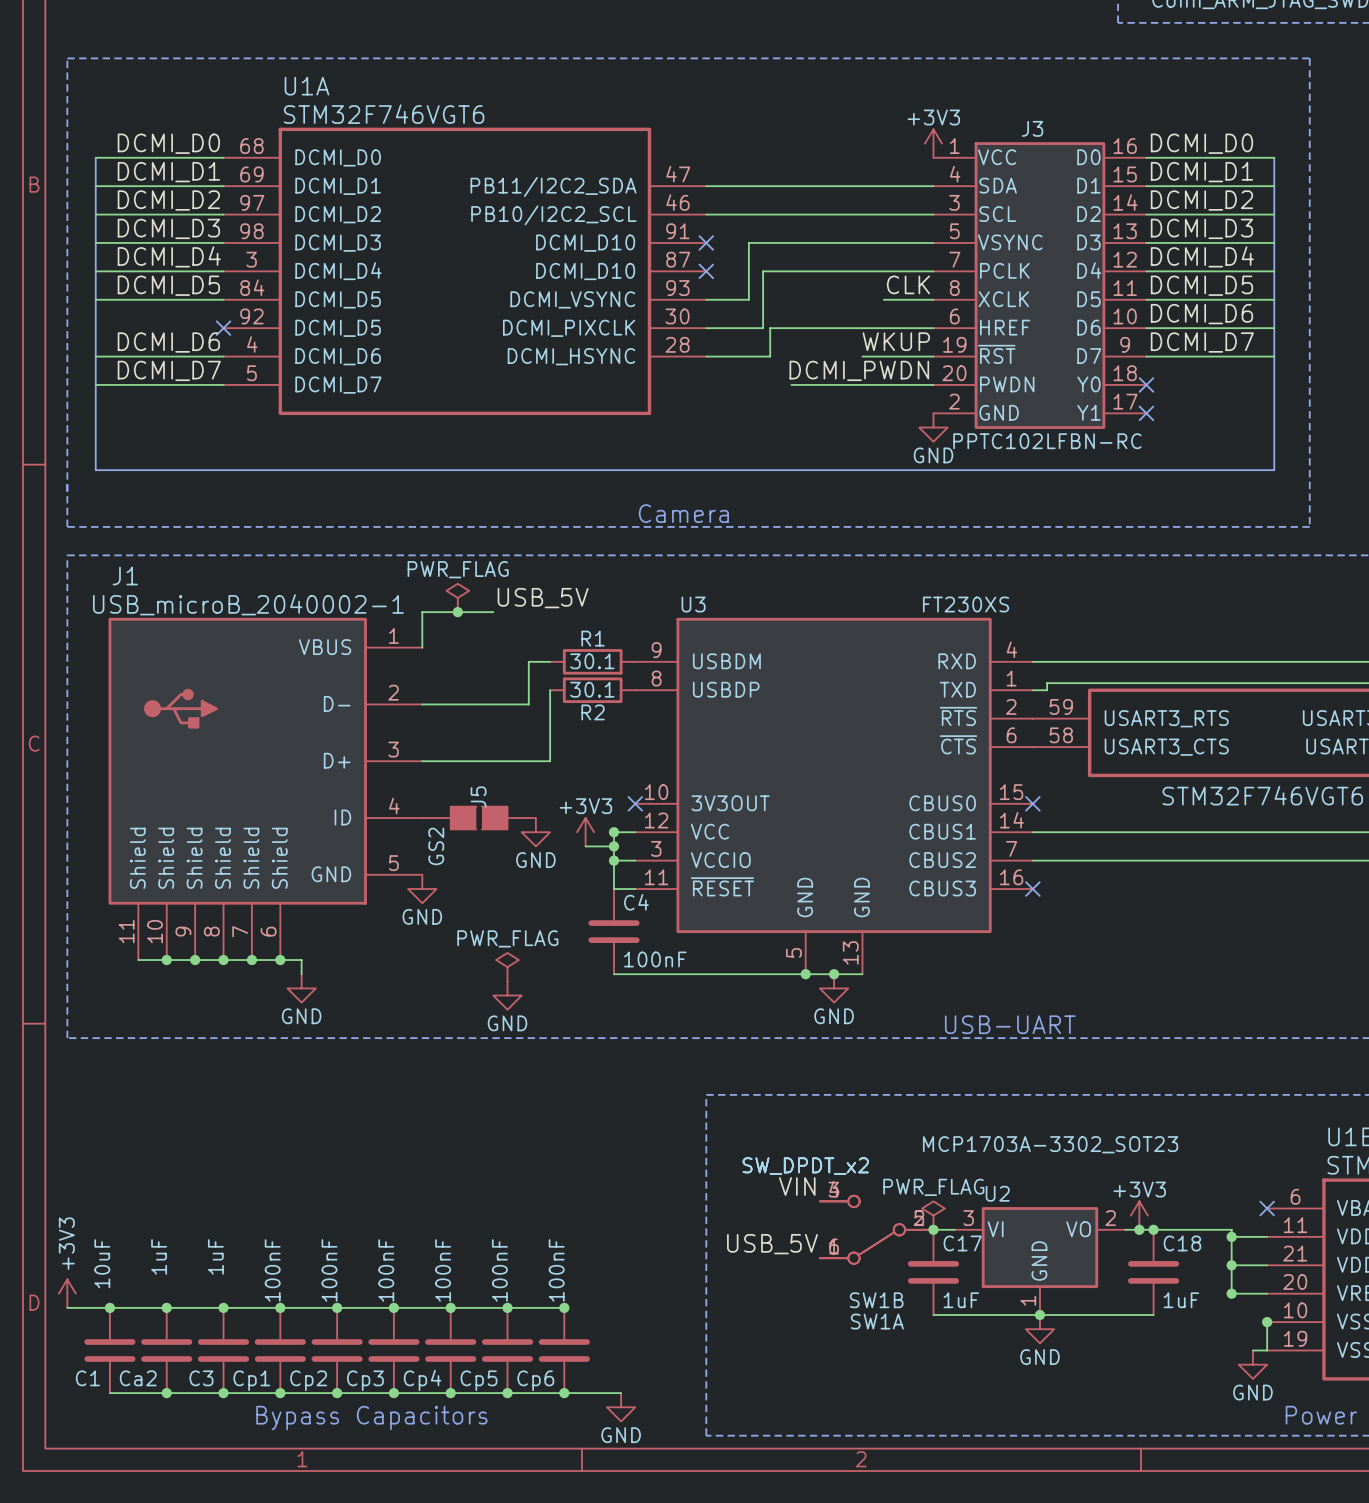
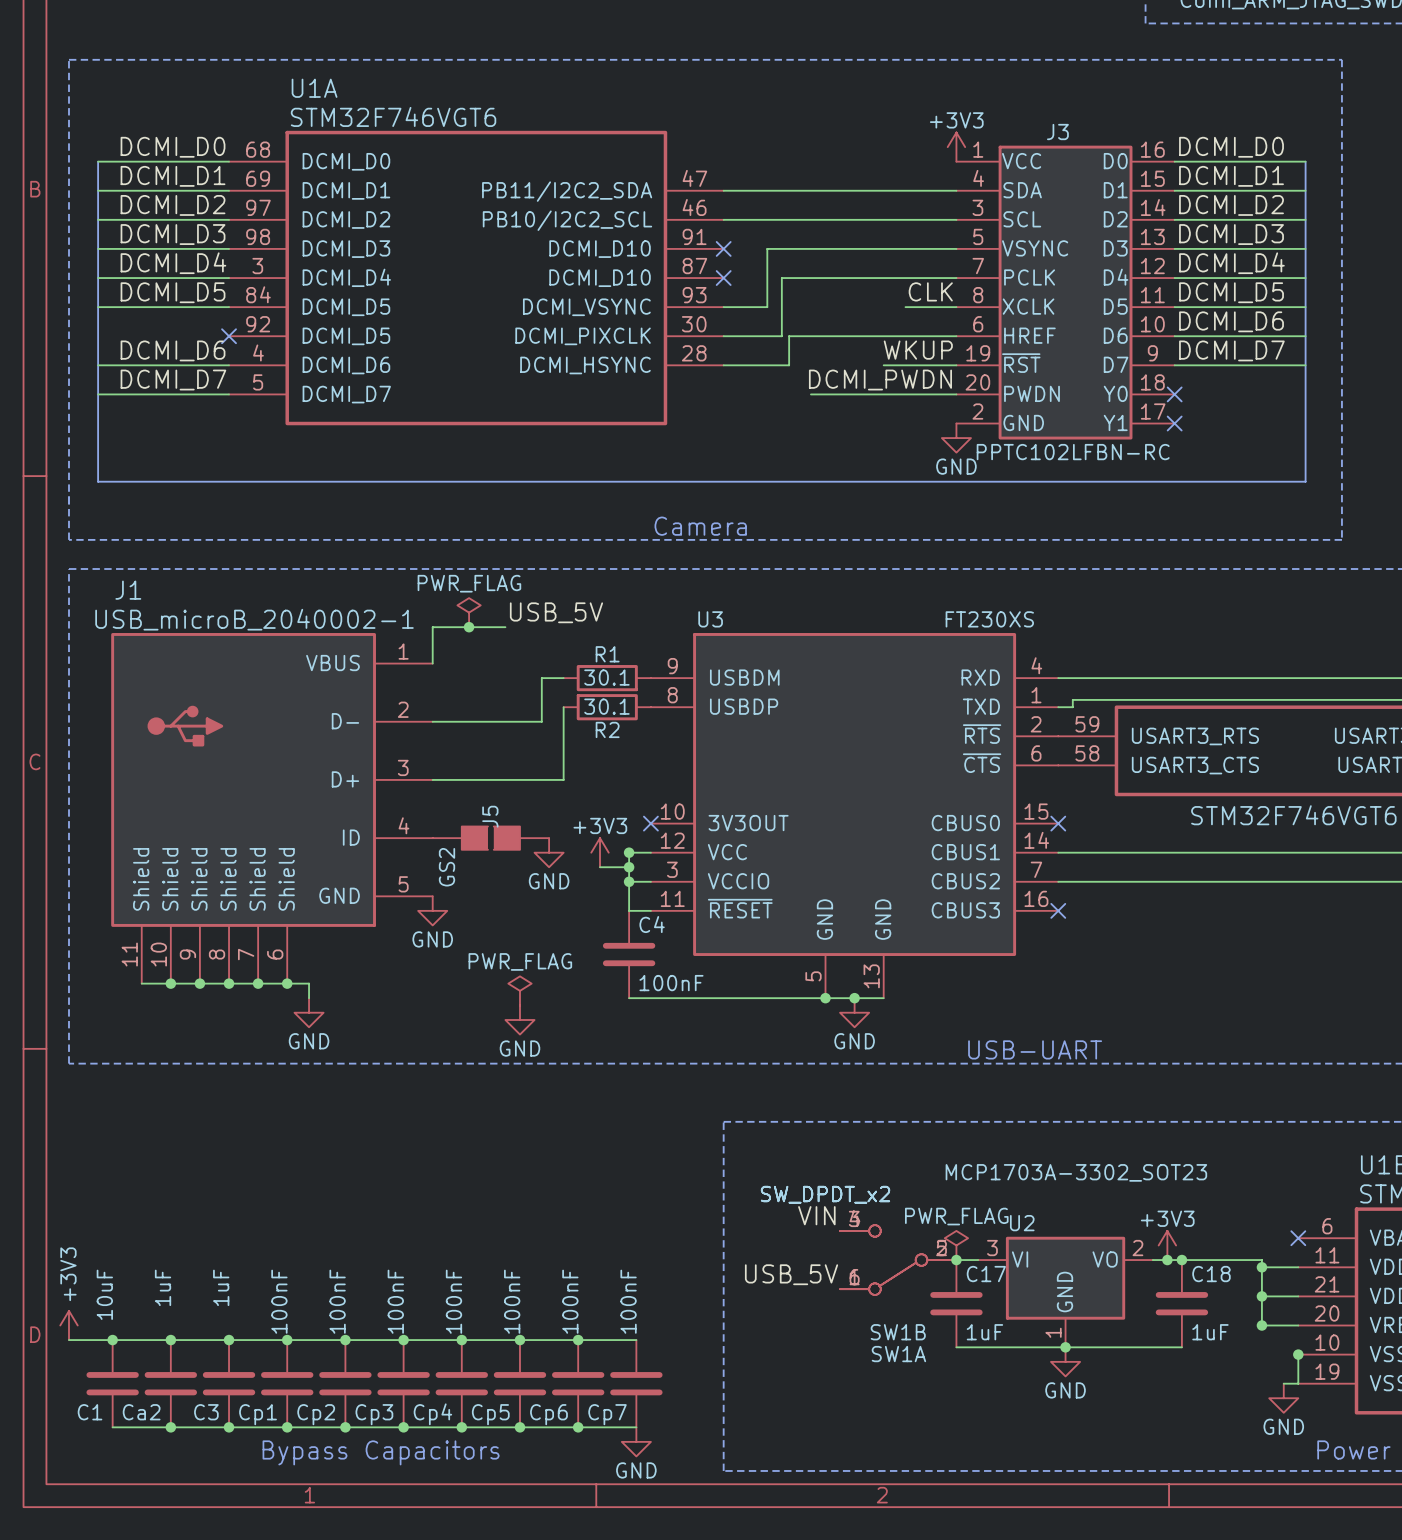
wire: none -> (578, 1340) (636, 1340)
Cp7: none -> 100nF (636, 1383)

